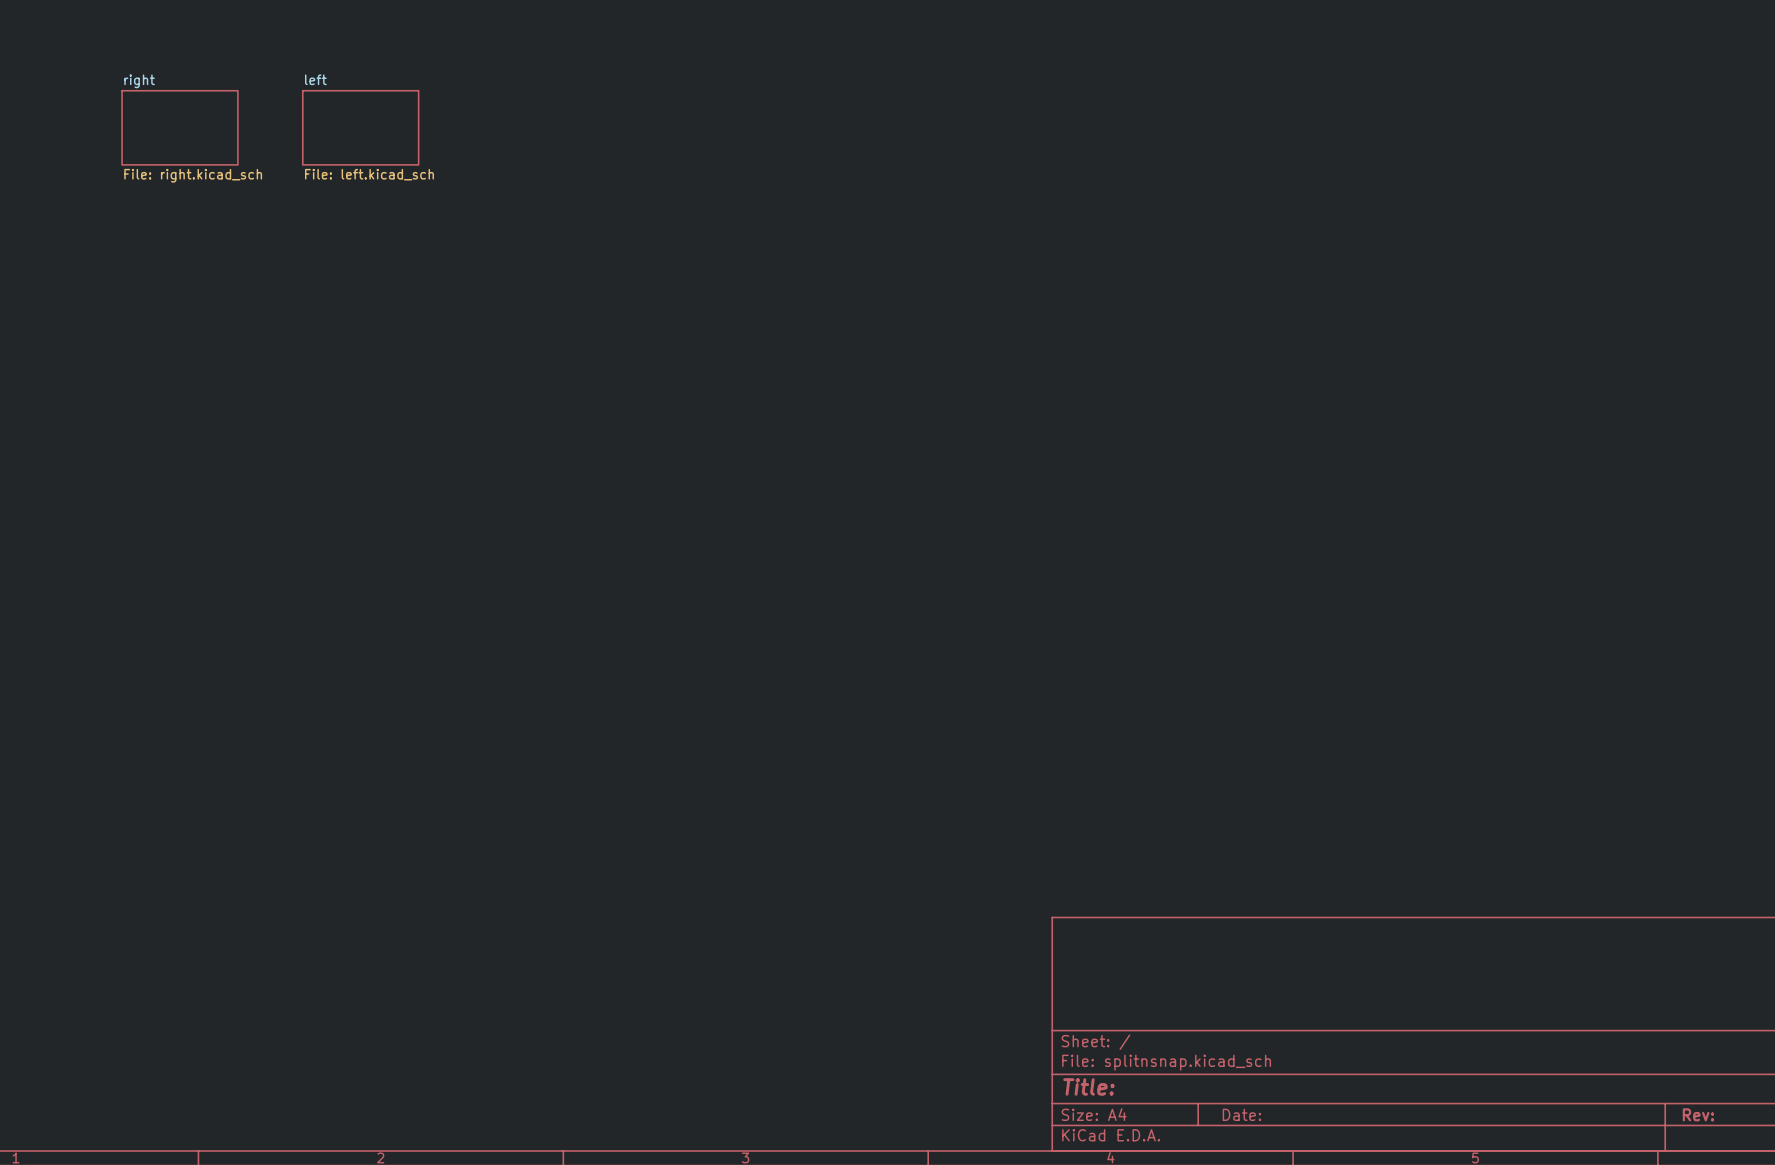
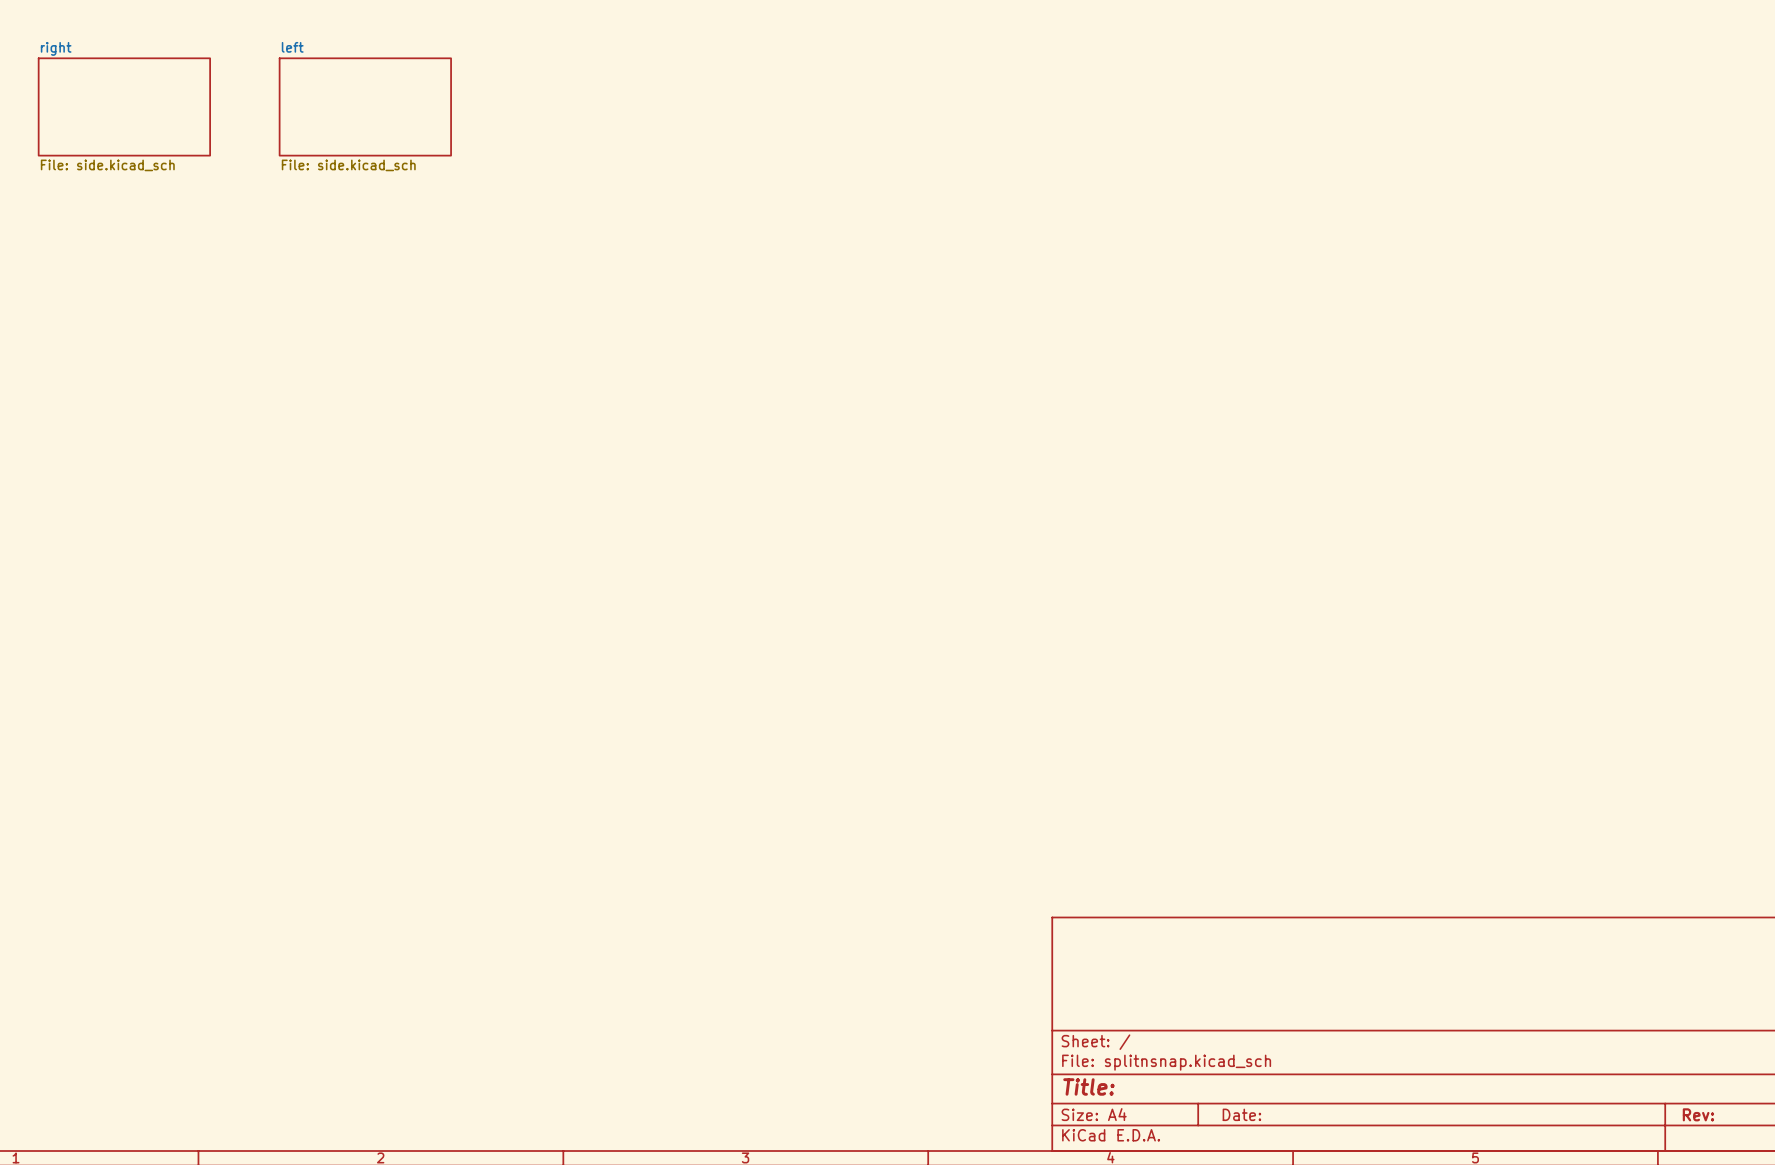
sheet right: none -> File: side.kicad_sch (124, 106)
sheet left: none -> File: side.kicad_sch (365, 106)
sheet right: File: right.kicad_sch (179, 127) -> none
sheet left: File: left.kicad_sch (360, 127) -> none

